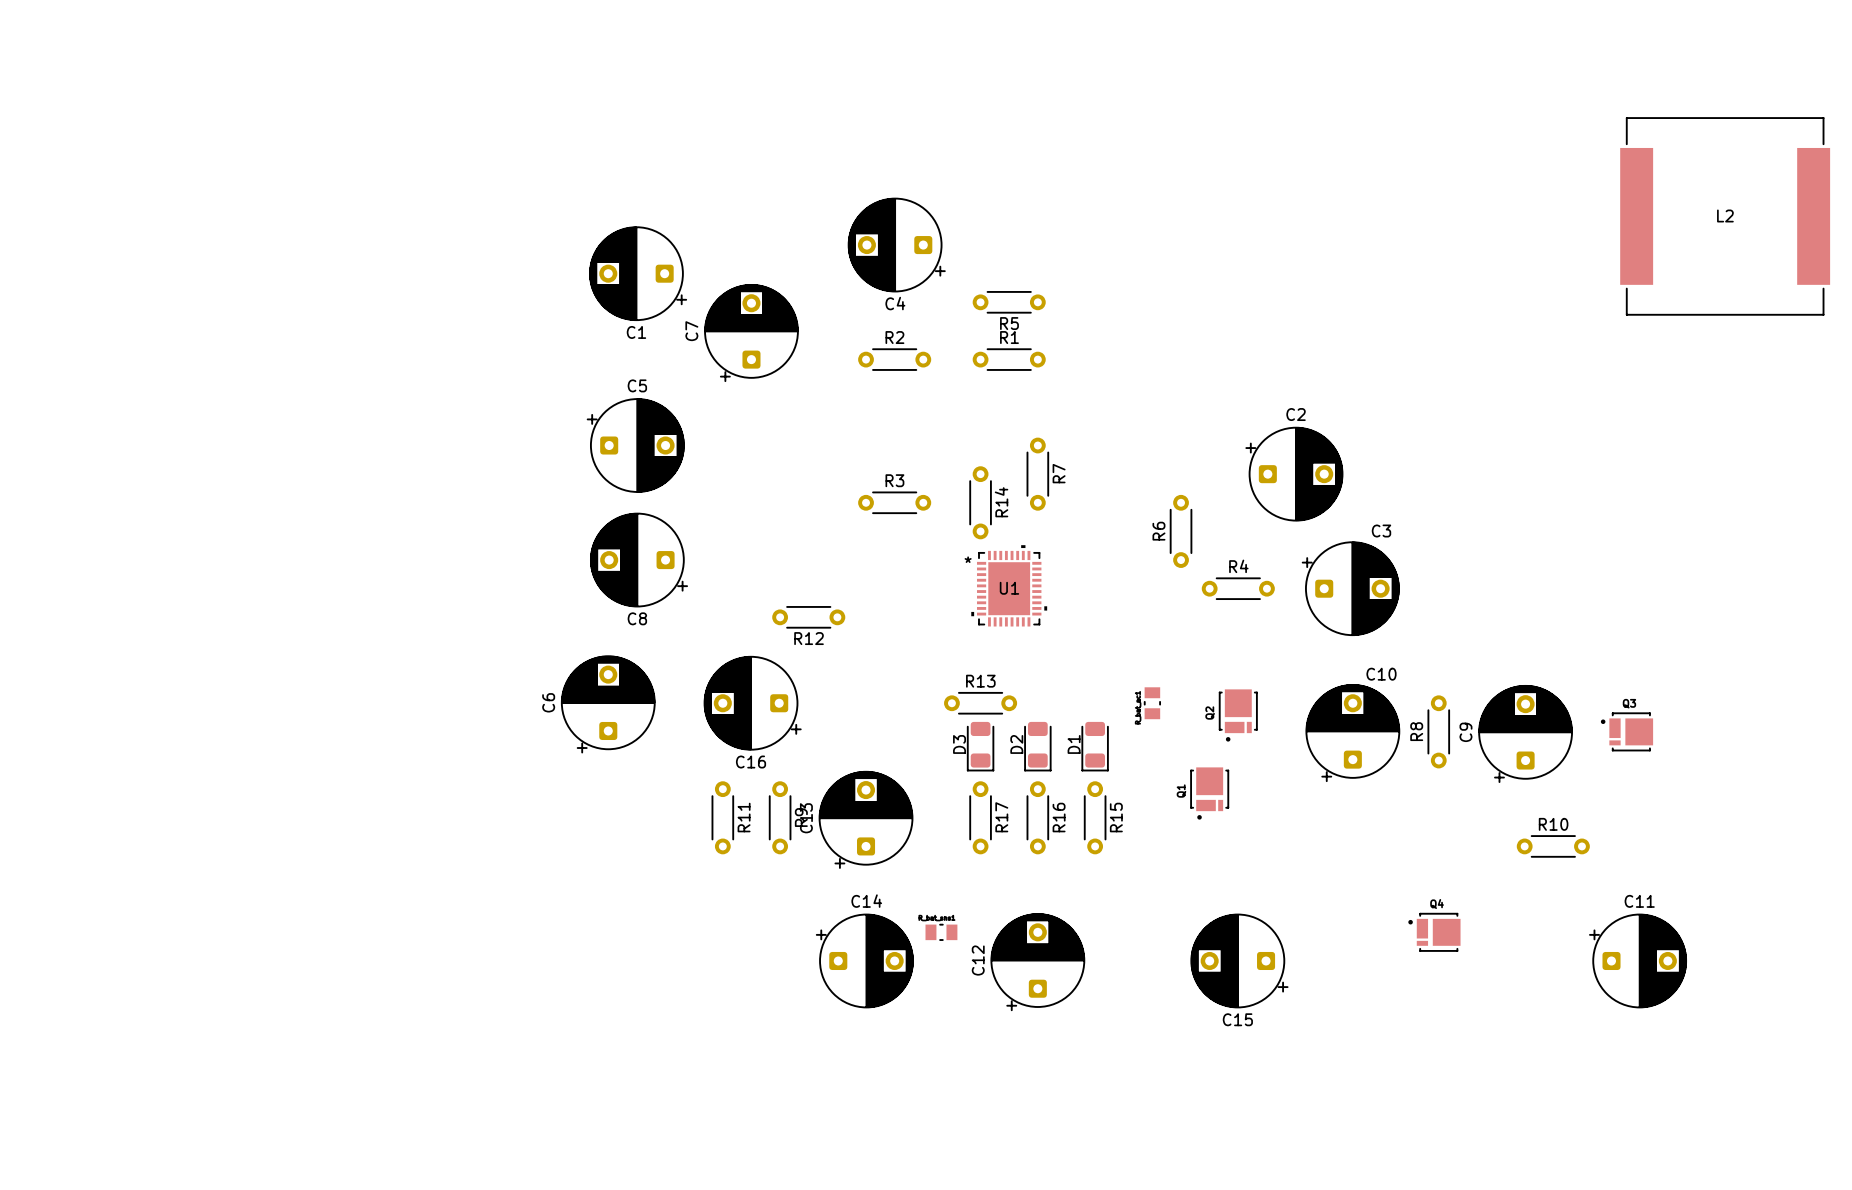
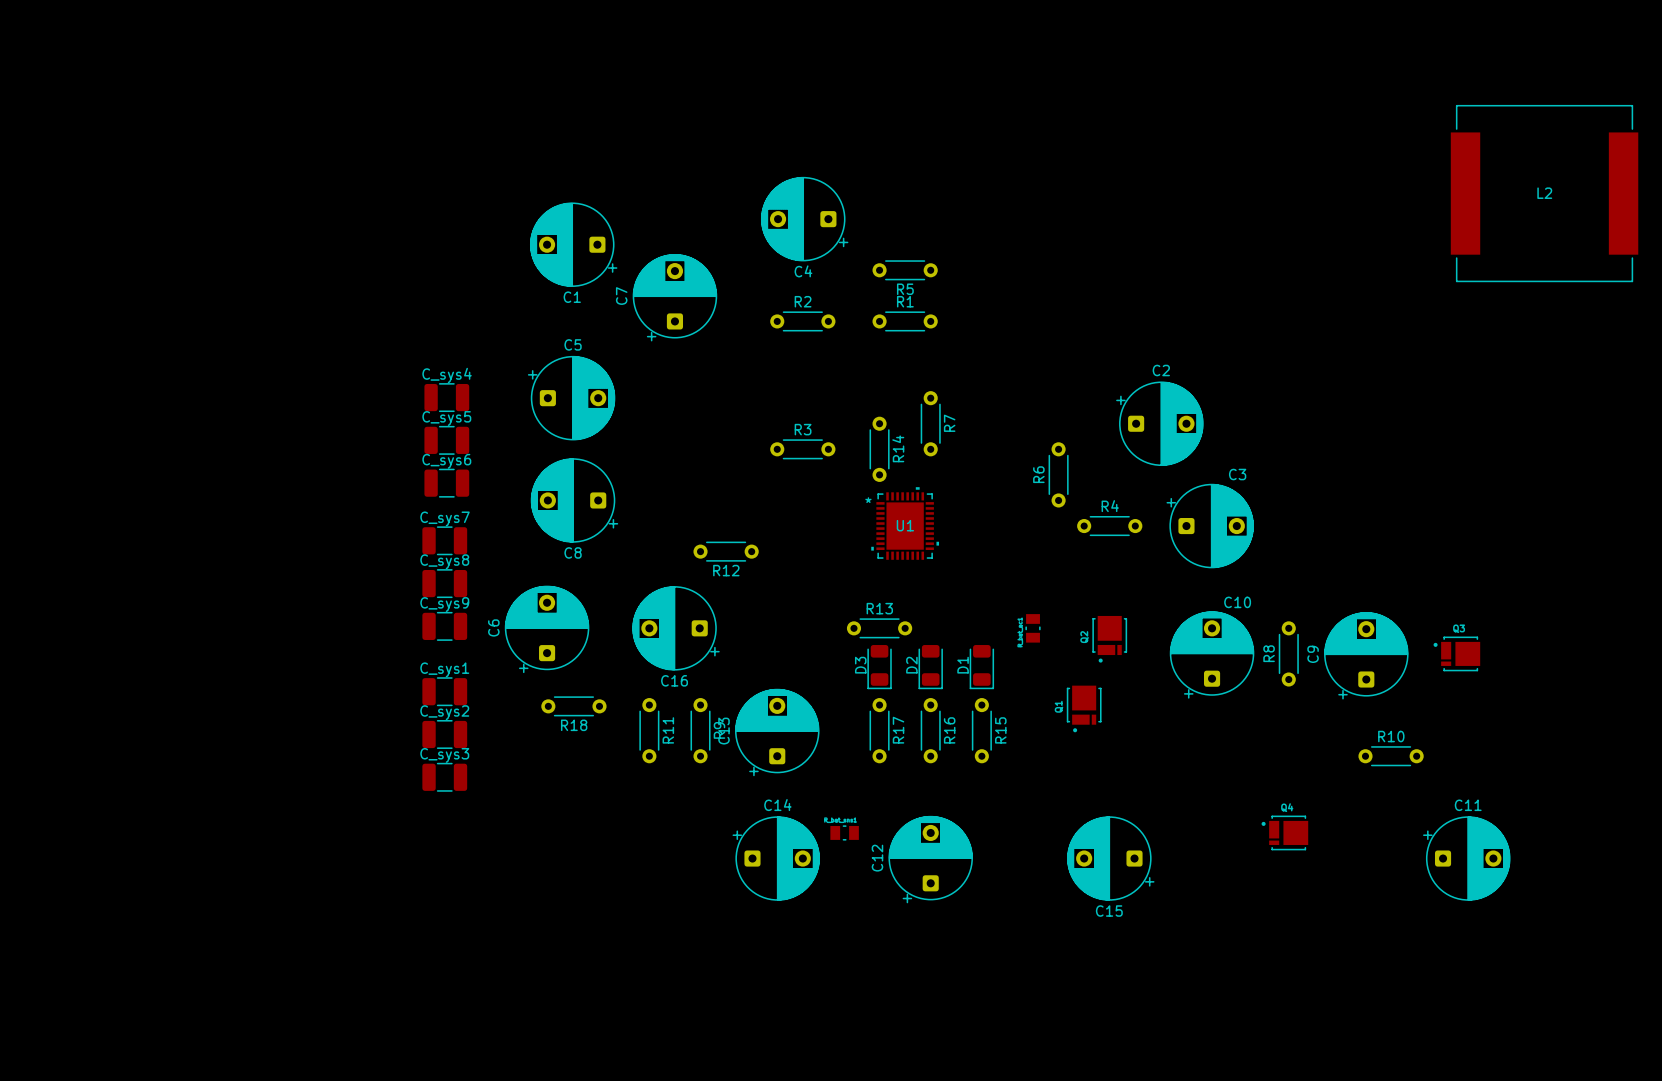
C_sys4: none -> (446, 397)
C_sys5: none -> (446, 440)
C_sys6: none -> (446, 483)
C_sys7: none -> (444, 540)
C_sys8: none -> (444, 583)
C_sys9: none -> (444, 626)
C_sys1: none -> (444, 691)
R18: none -> (573, 706)
C_sys2: none -> (444, 734)
C_sys3: none -> (444, 777)

